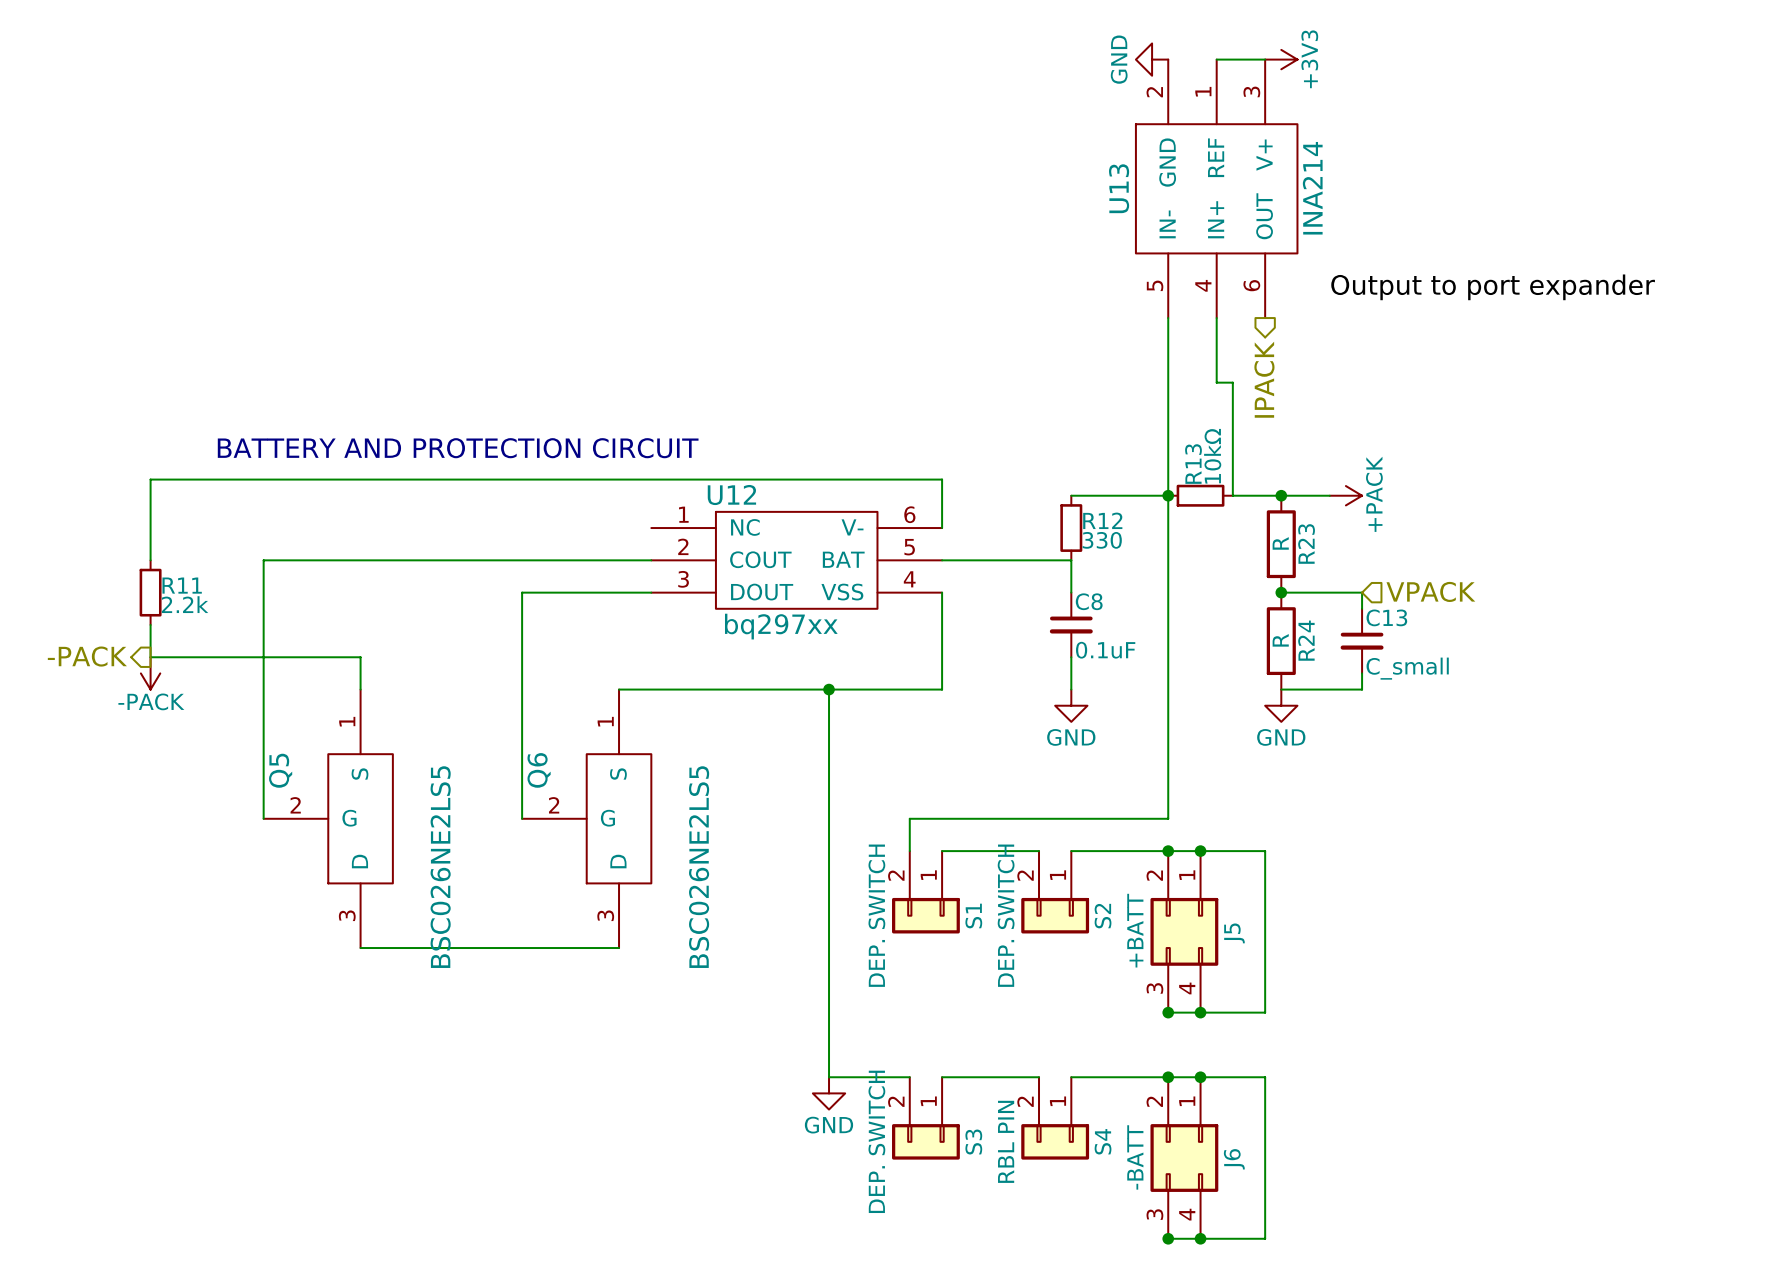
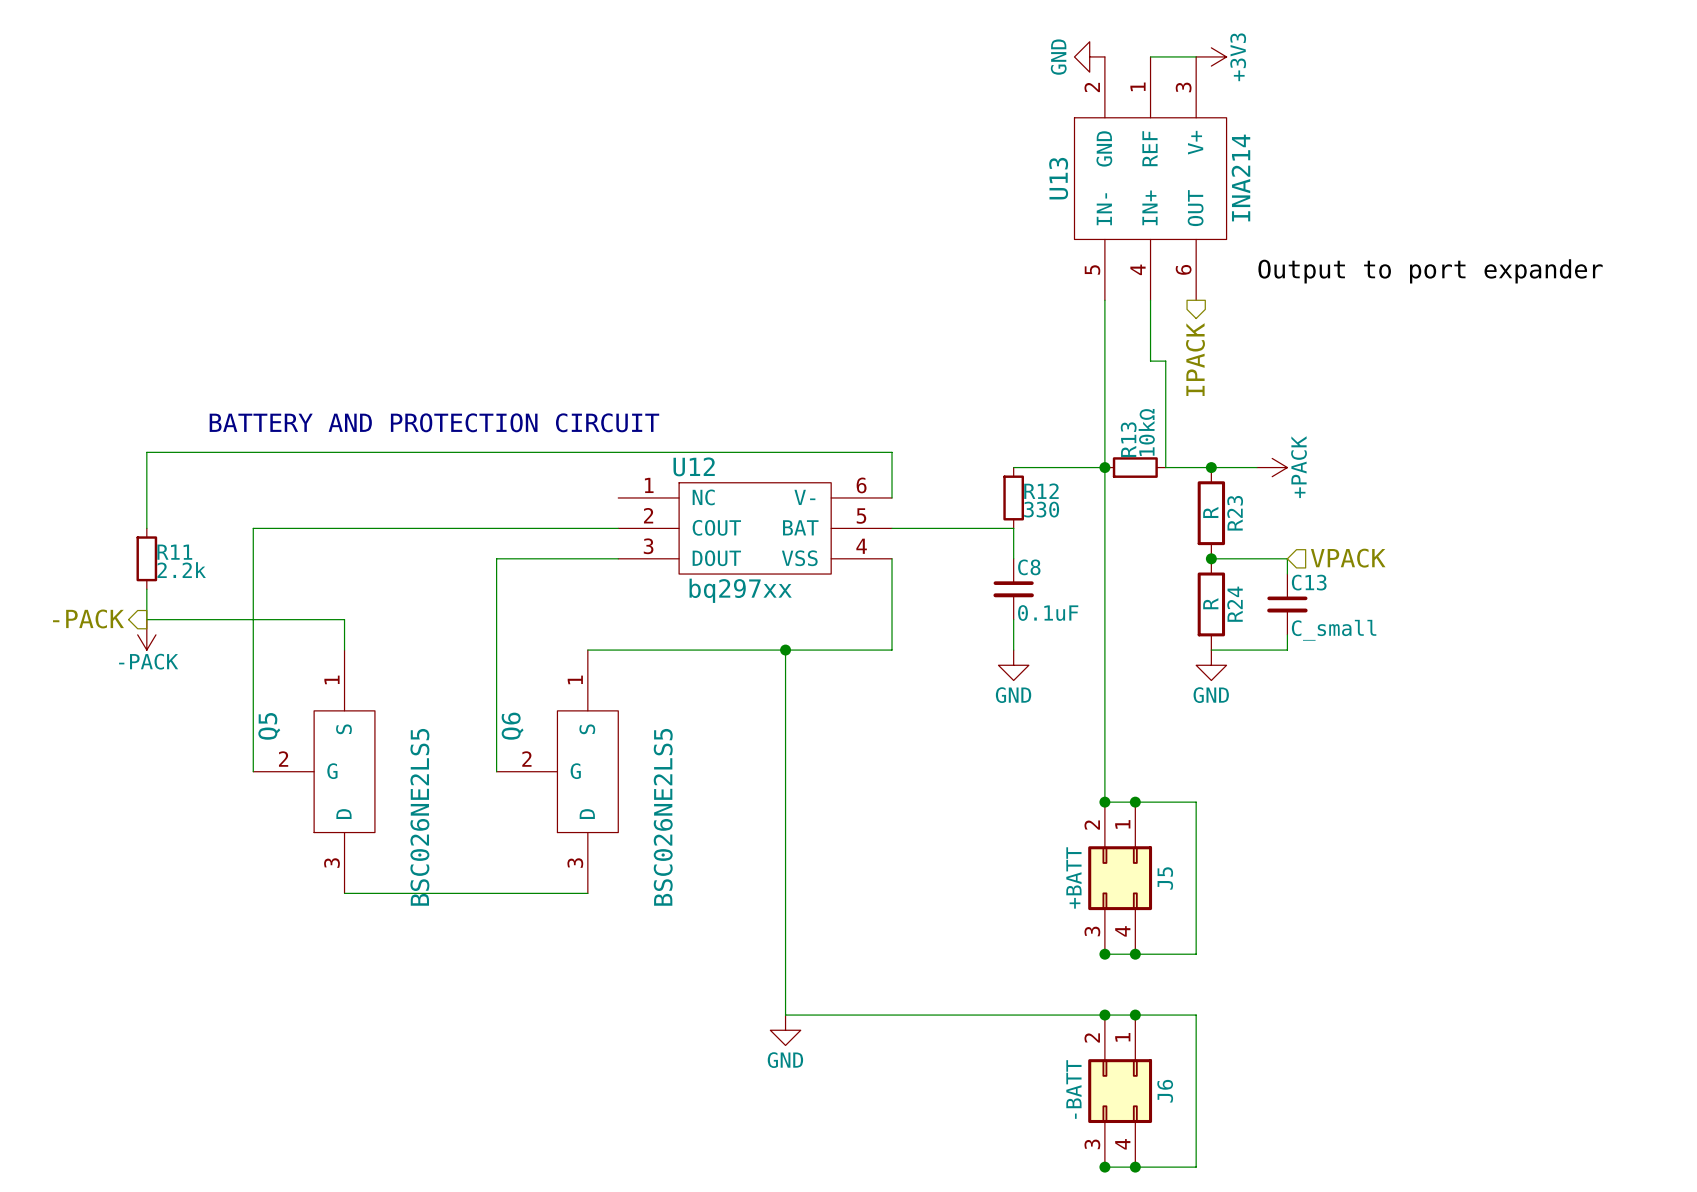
wire: (1168, 818) (909, 818) (909, 851) -> none
wire: (942, 851) (1039, 851) -> none
wire: (1071, 851) (1168, 851) -> (1104, 771) (1104, 802)
S1: DEP. SWITCH (925, 892) -> none
S2: DEP. SWITCH (1055, 892) -> none
wire: none -> (861, 1015) (892, 1015)
wire: none -> (983, 1015) (1013, 1015)
S3: DEP. SWITCH (925, 1118) -> none
S4: RBL PIN (1055, 1118) -> none

